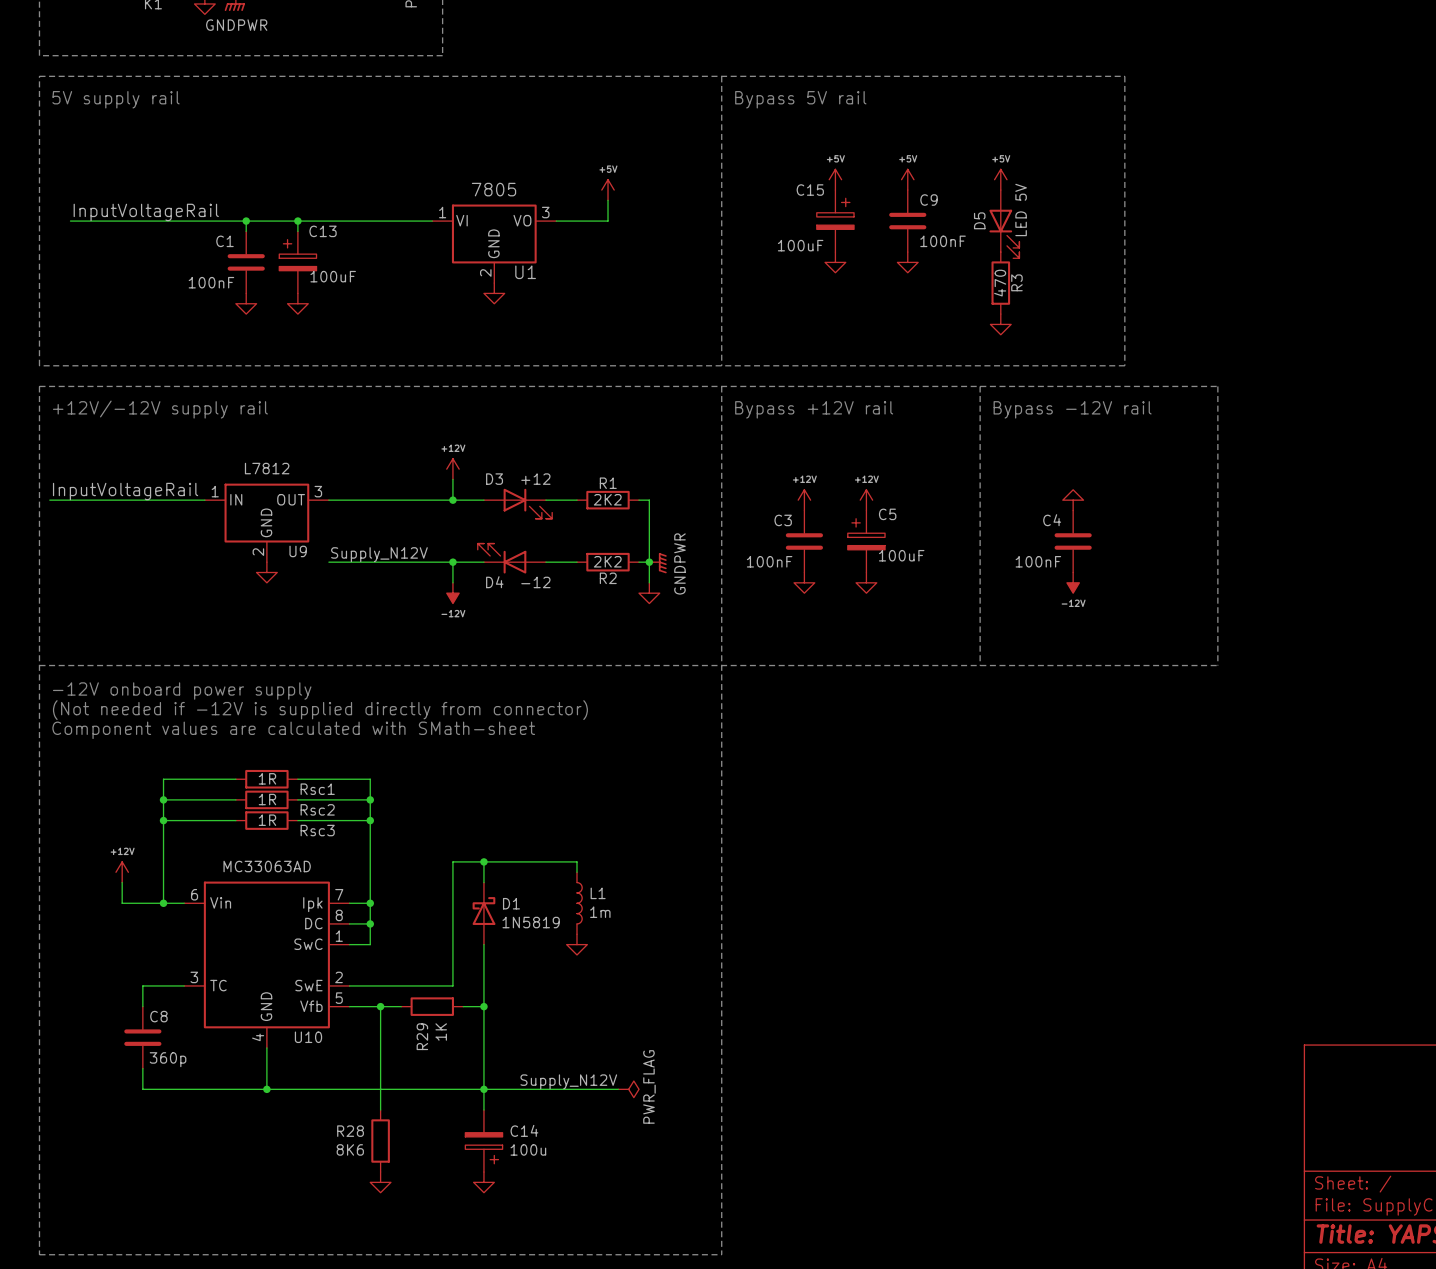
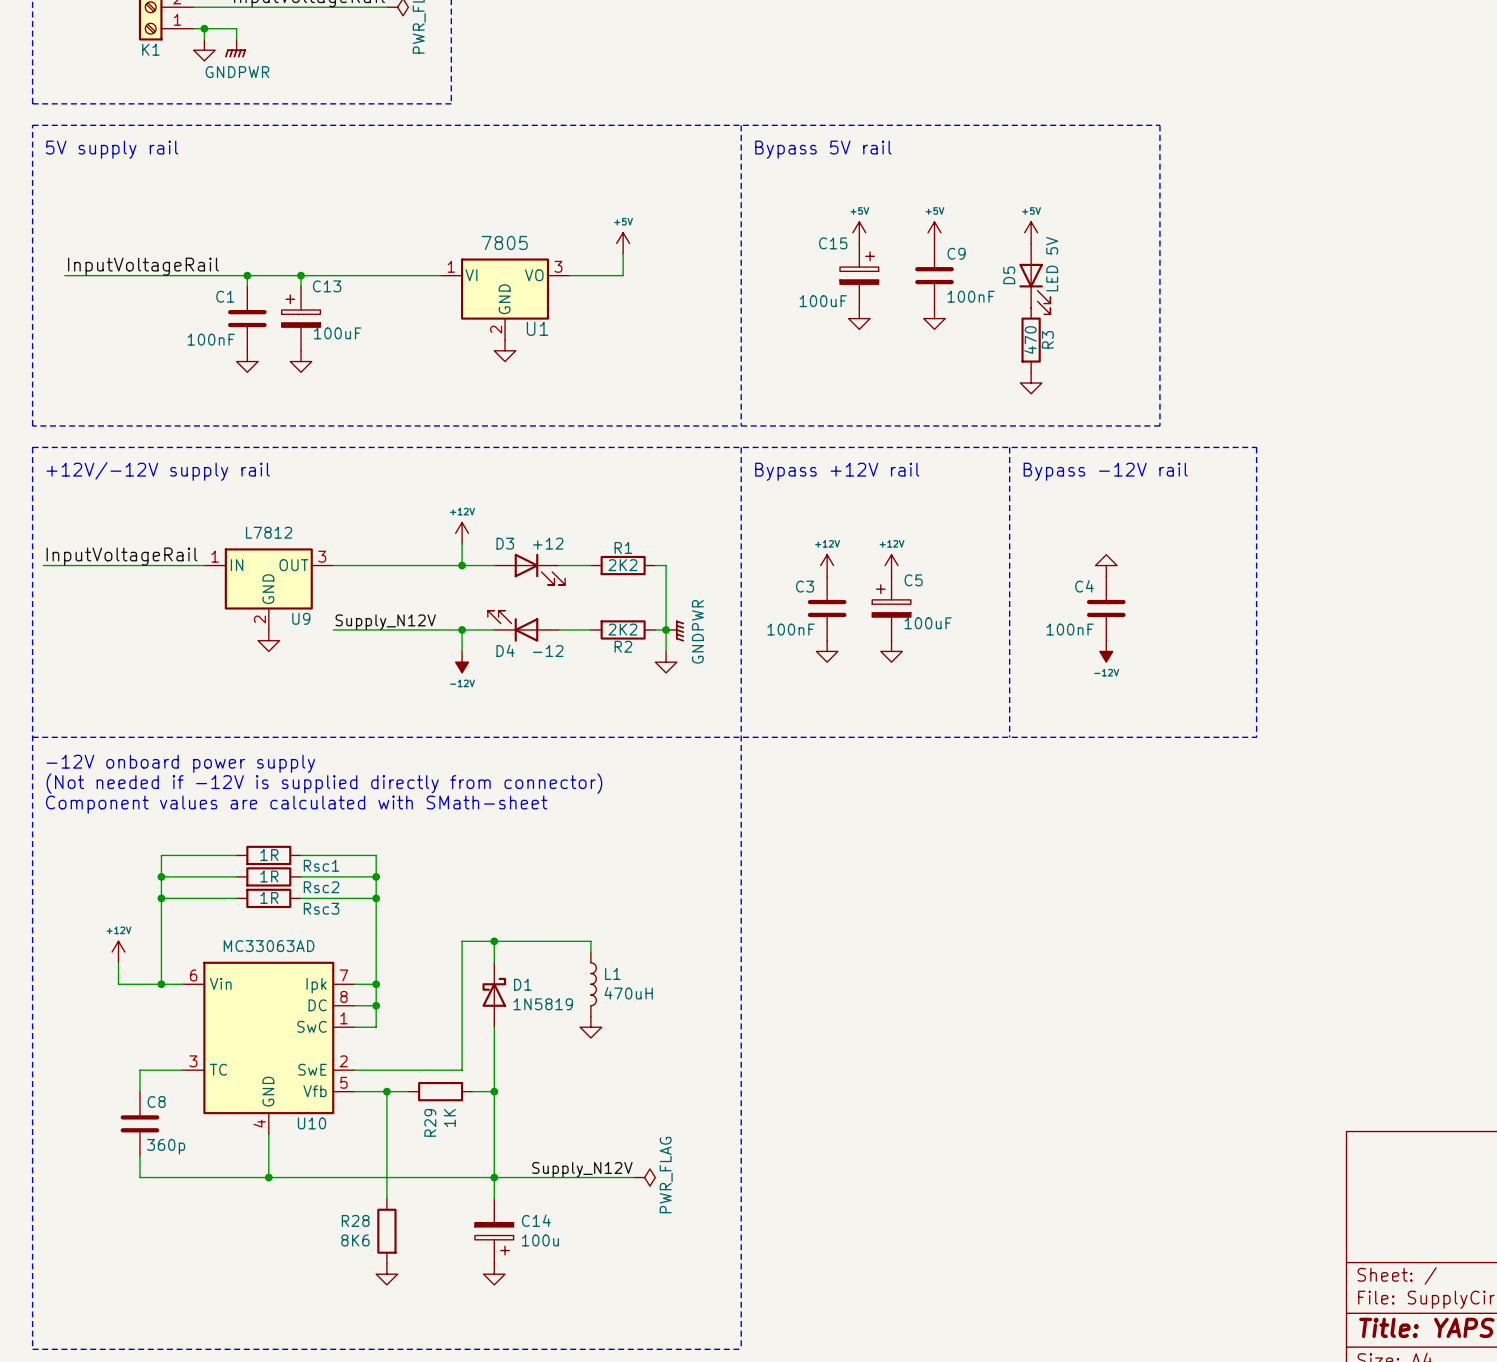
L1 value: 1m (600, 912) -> 470uH (628, 993)

